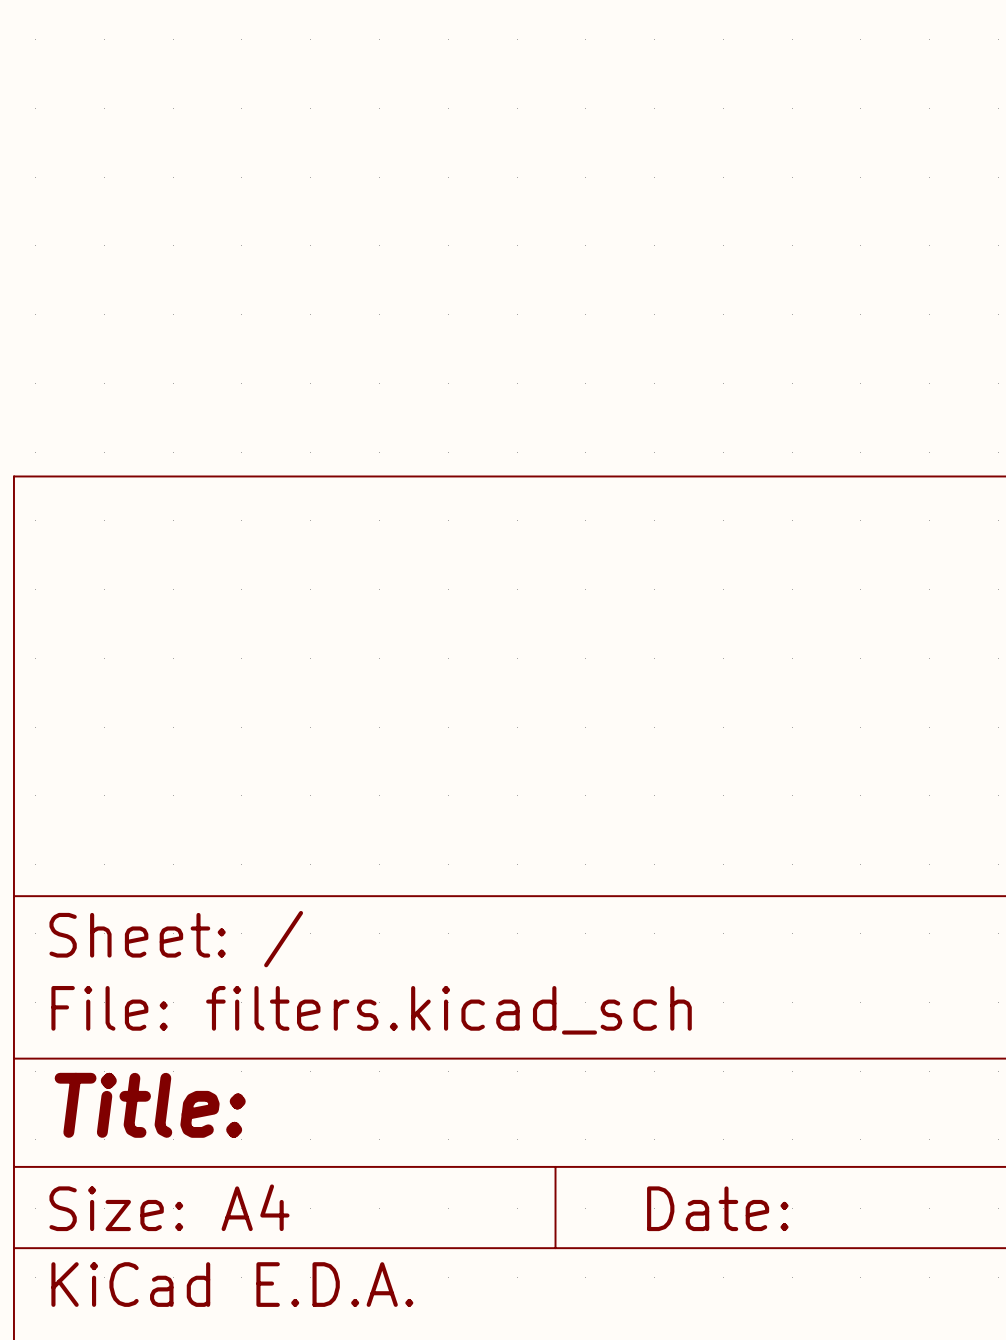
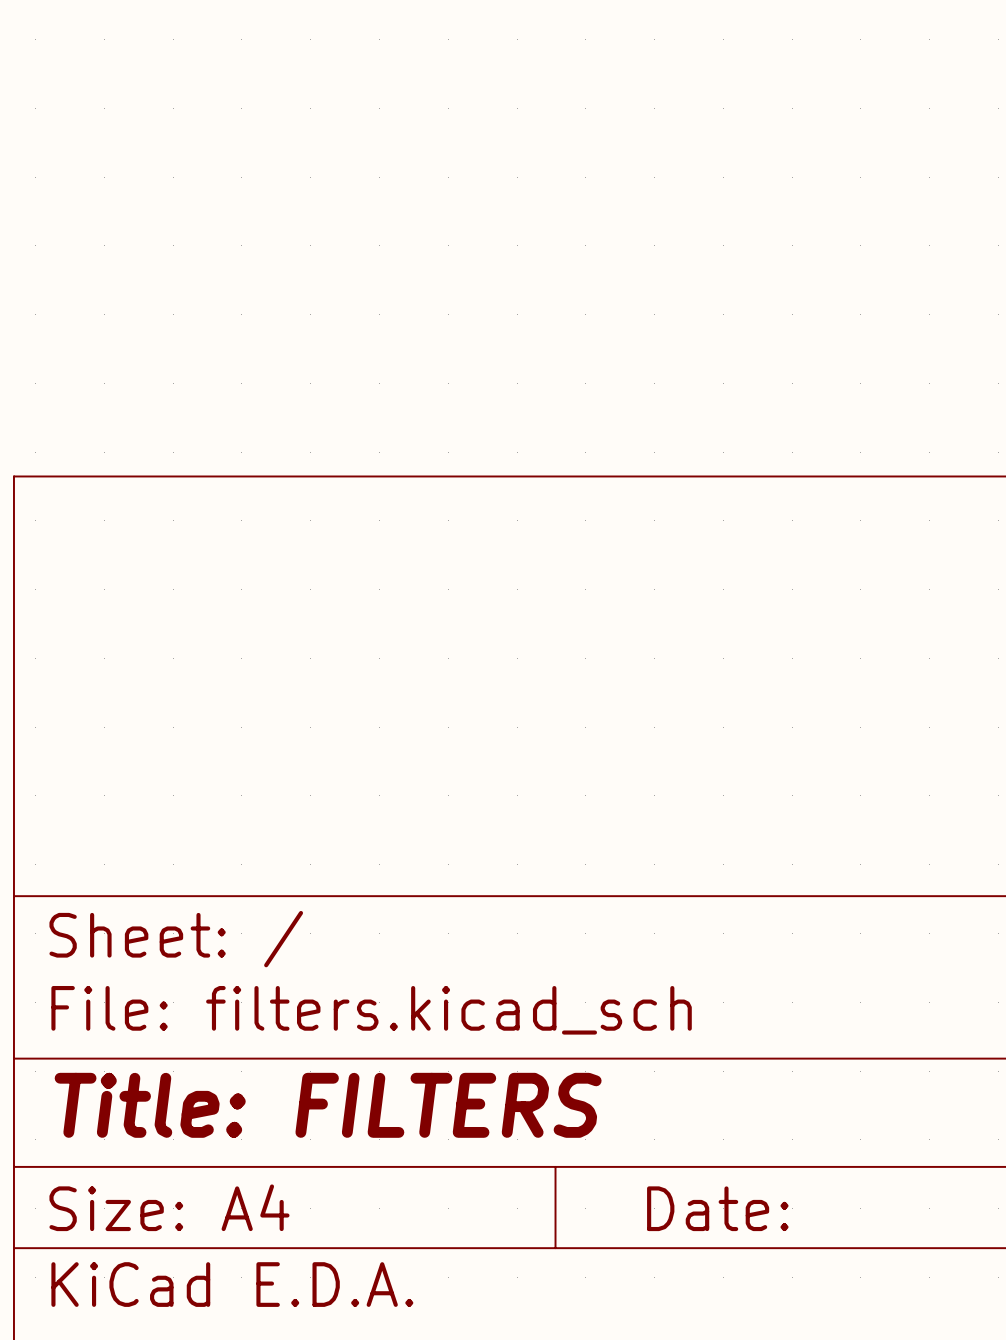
title block: Title: (150, 1105) -> Title: FILTERS (328, 1105)

